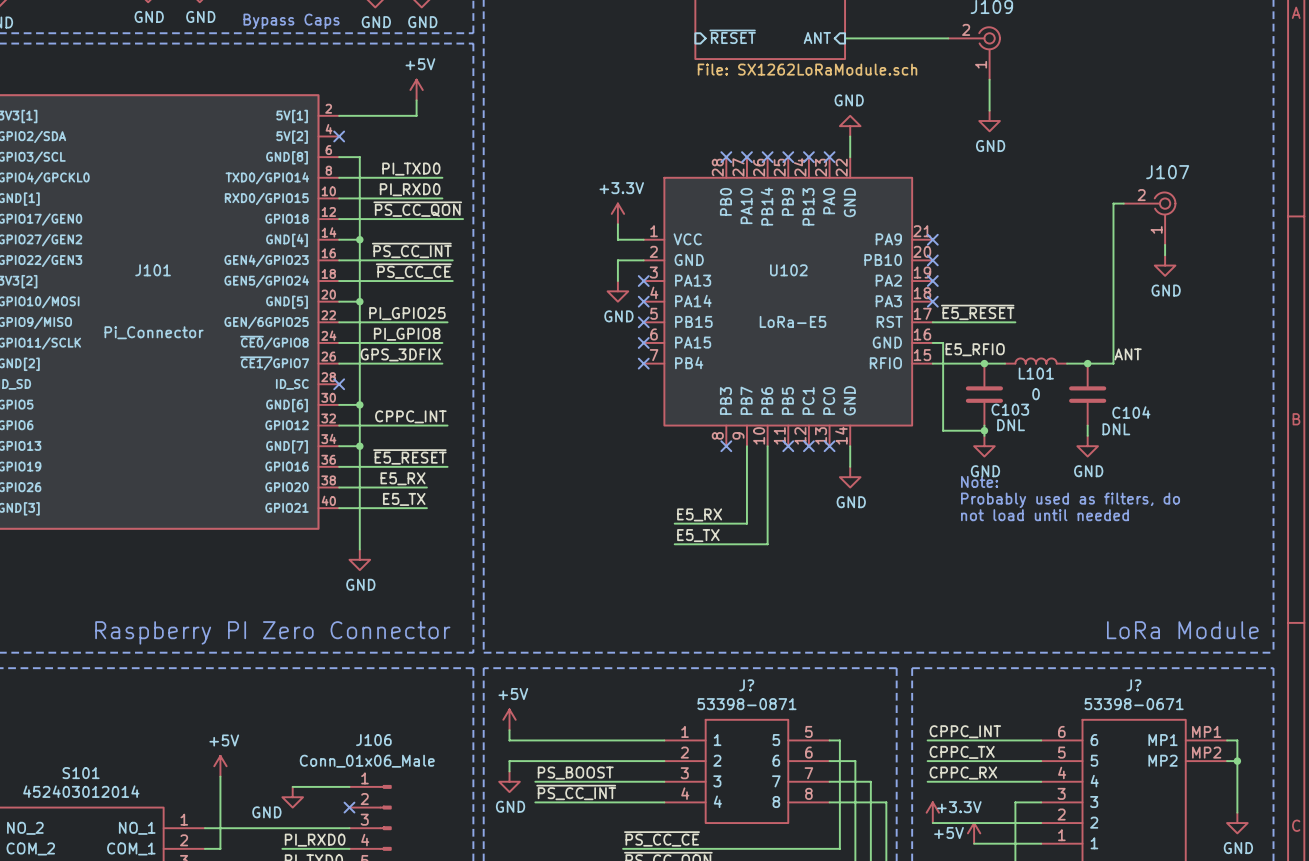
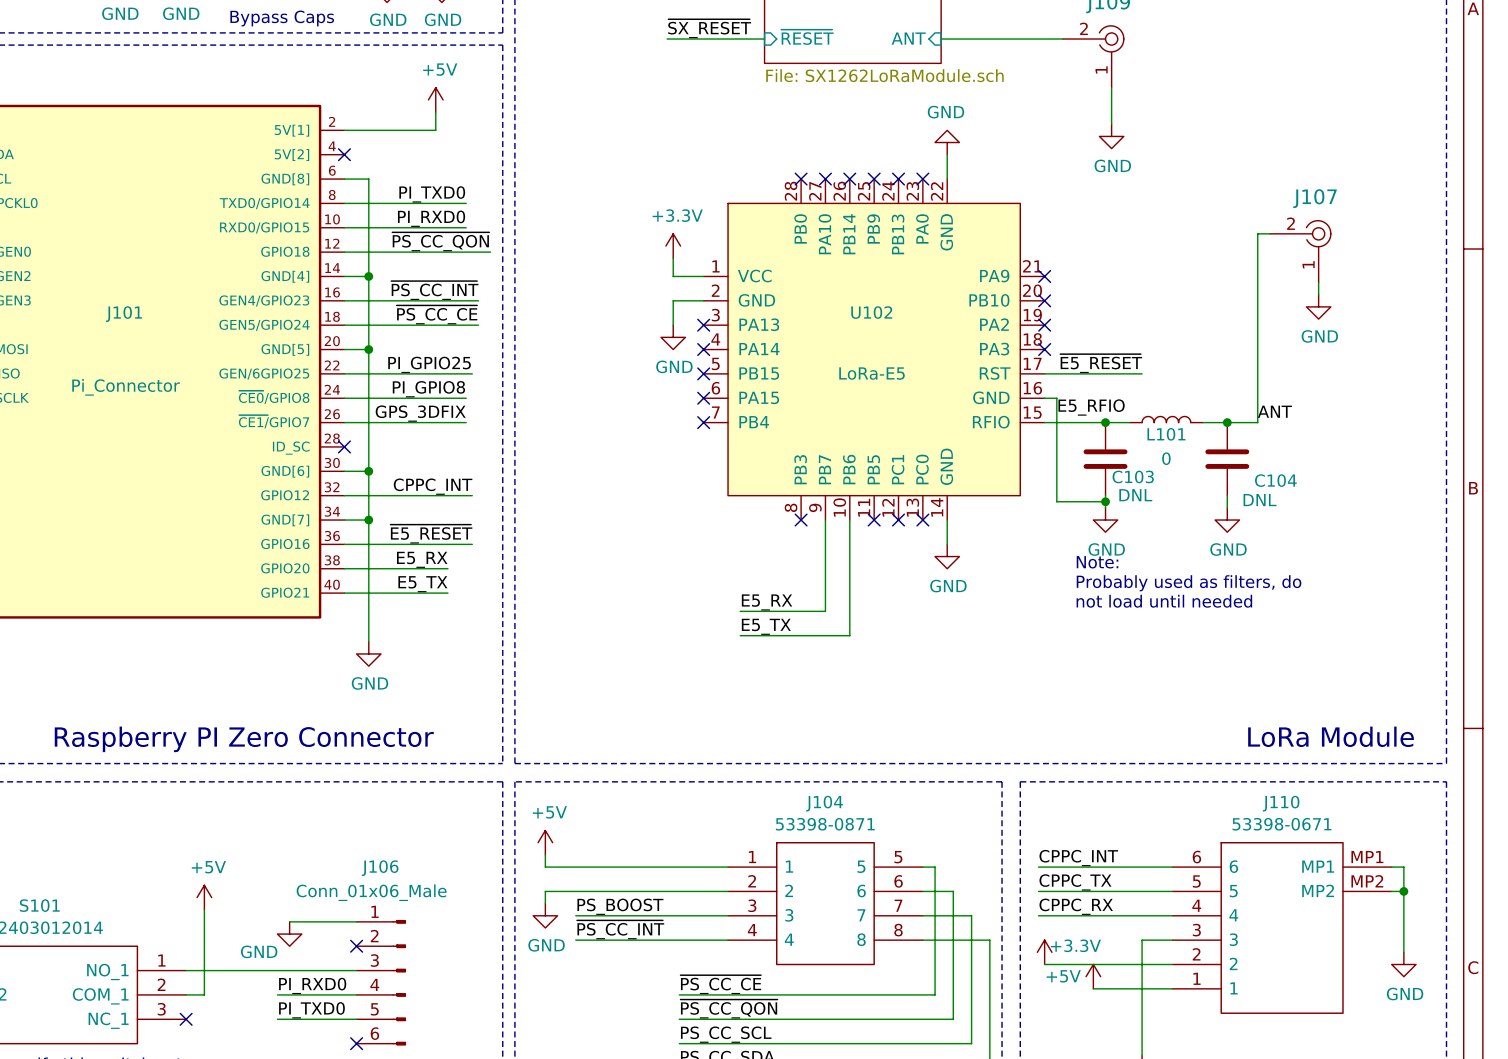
label: none -> ~{SX_RESET} (709, 28)
wire: none -> (667, 39) (764, 39)
J? name: J? (746, 685) -> J104 (824, 803)
J? name: J? (1133, 685) -> J110 (1281, 803)

